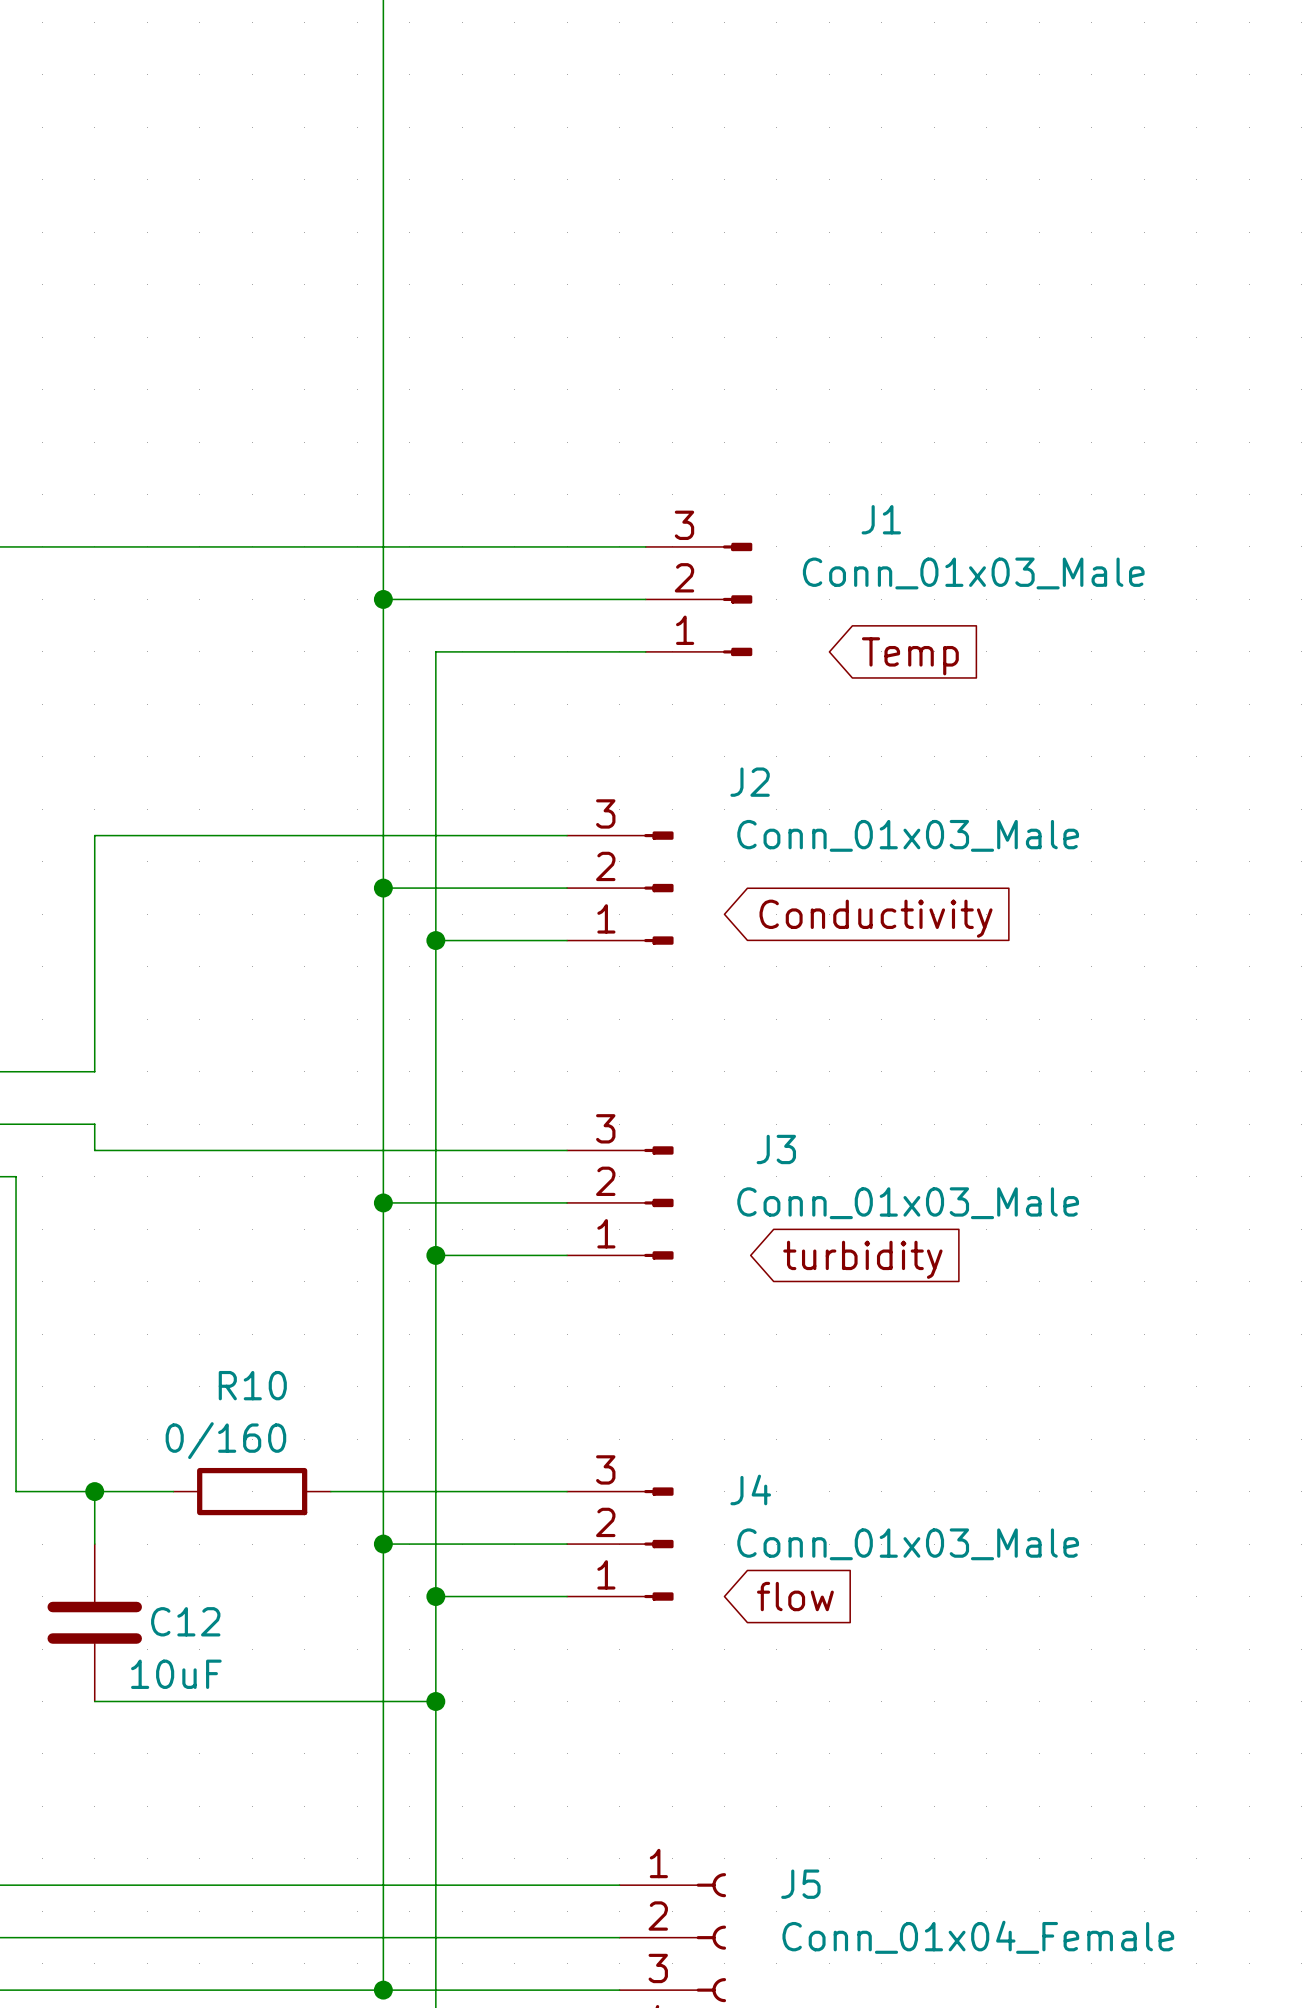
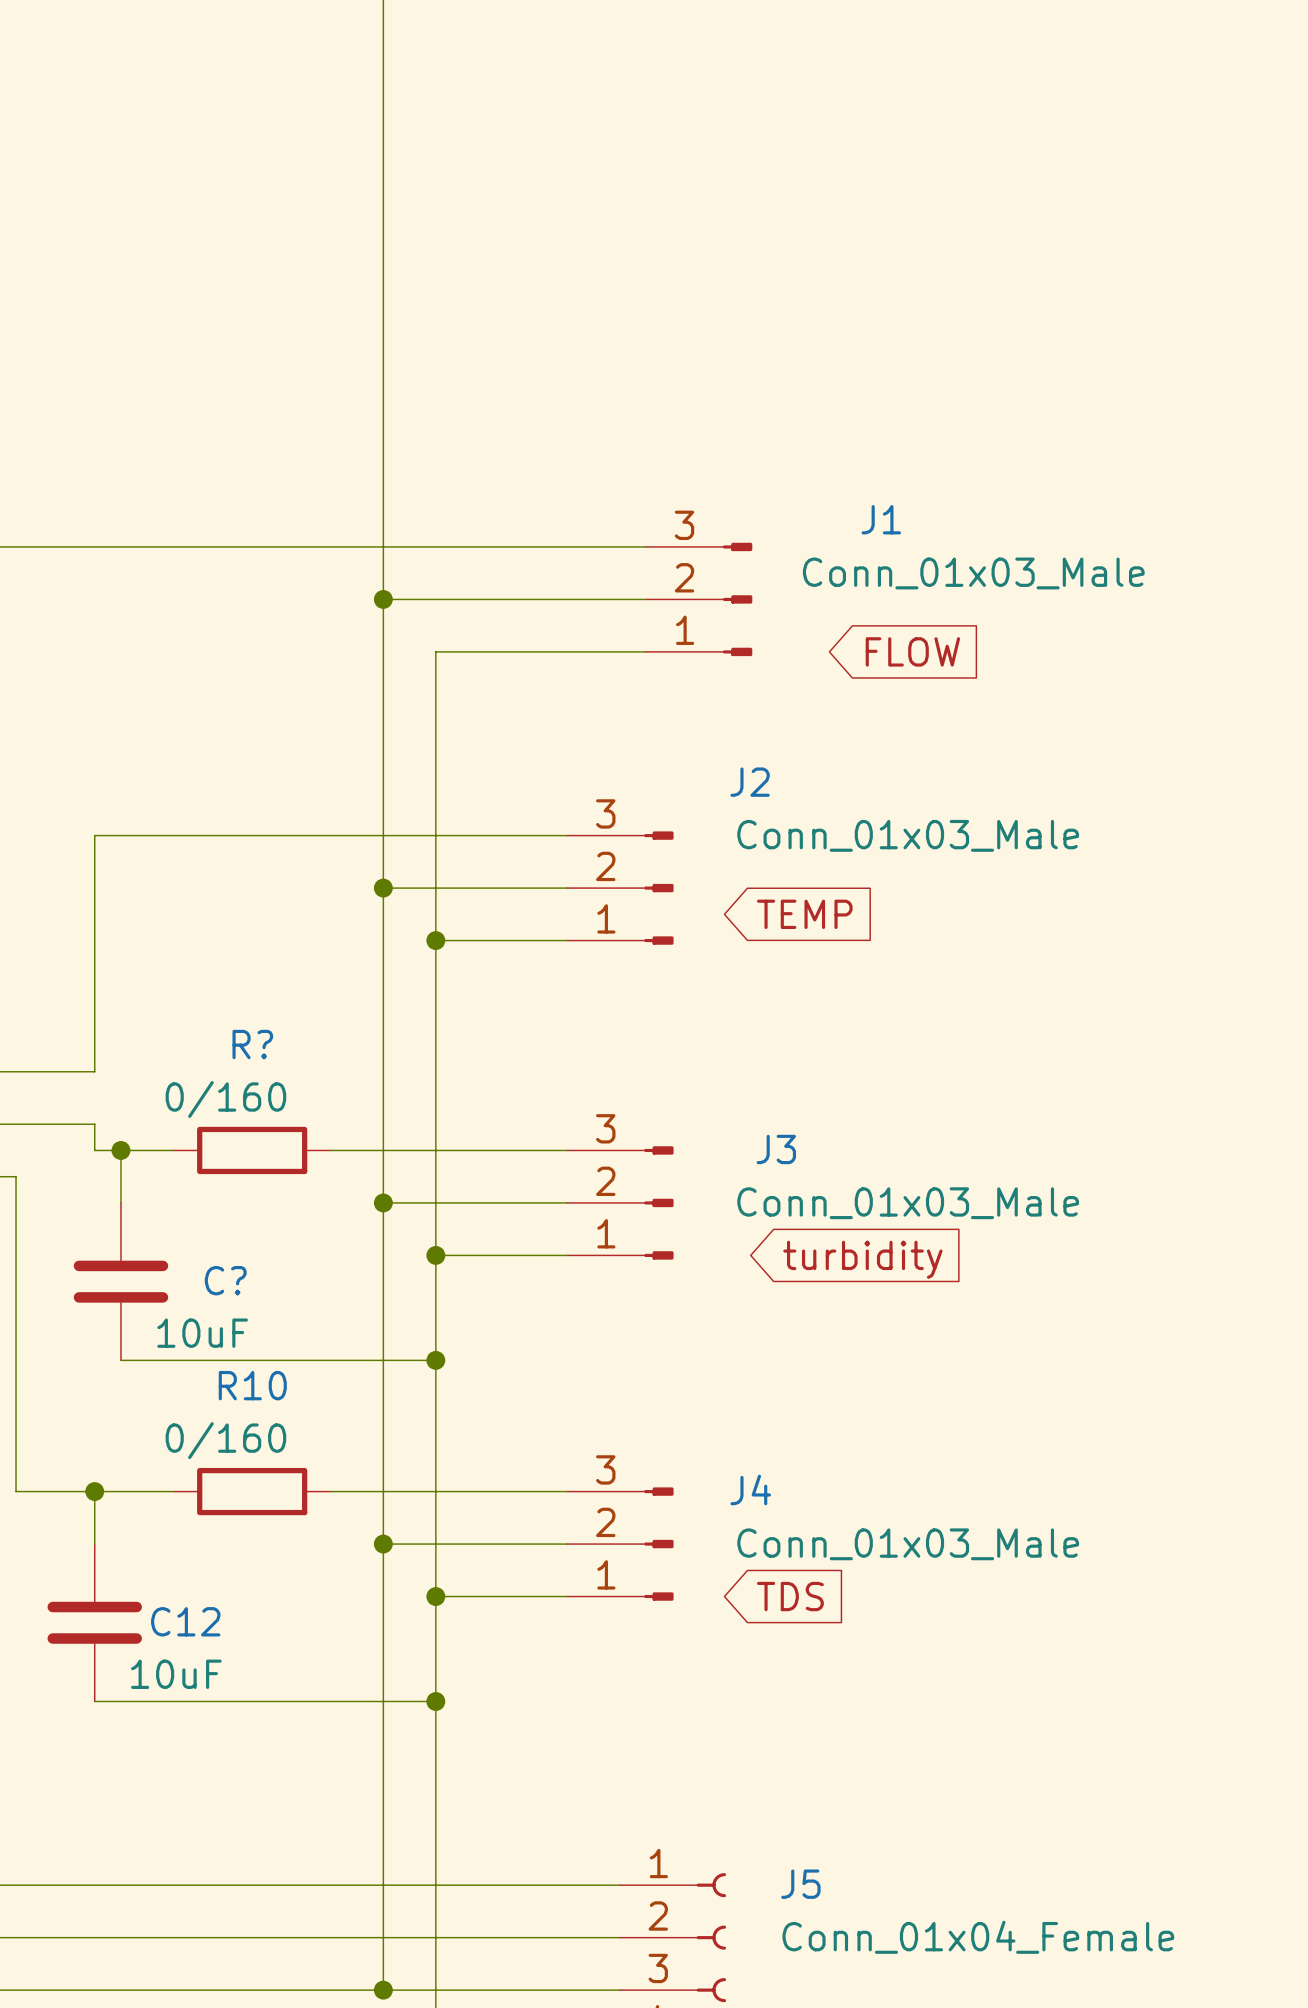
global label: Temp (910, 656) -> FLOW (912, 651)
global label: Conductivity (876, 918) -> TEMP (804, 914)
wire: none -> (120, 1150) (120, 1202)
junction: none -> (120, 1150)
wire: (173, 1150) (330, 1150) -> none
R?: none -> 0/160 (252, 1150)
C?: none -> 10uF (120, 1281)
wire: none -> (120, 1360) (435, 1360)
junction: none -> (435, 1360)
global label: flow (795, 1596) -> TDS (790, 1596)

